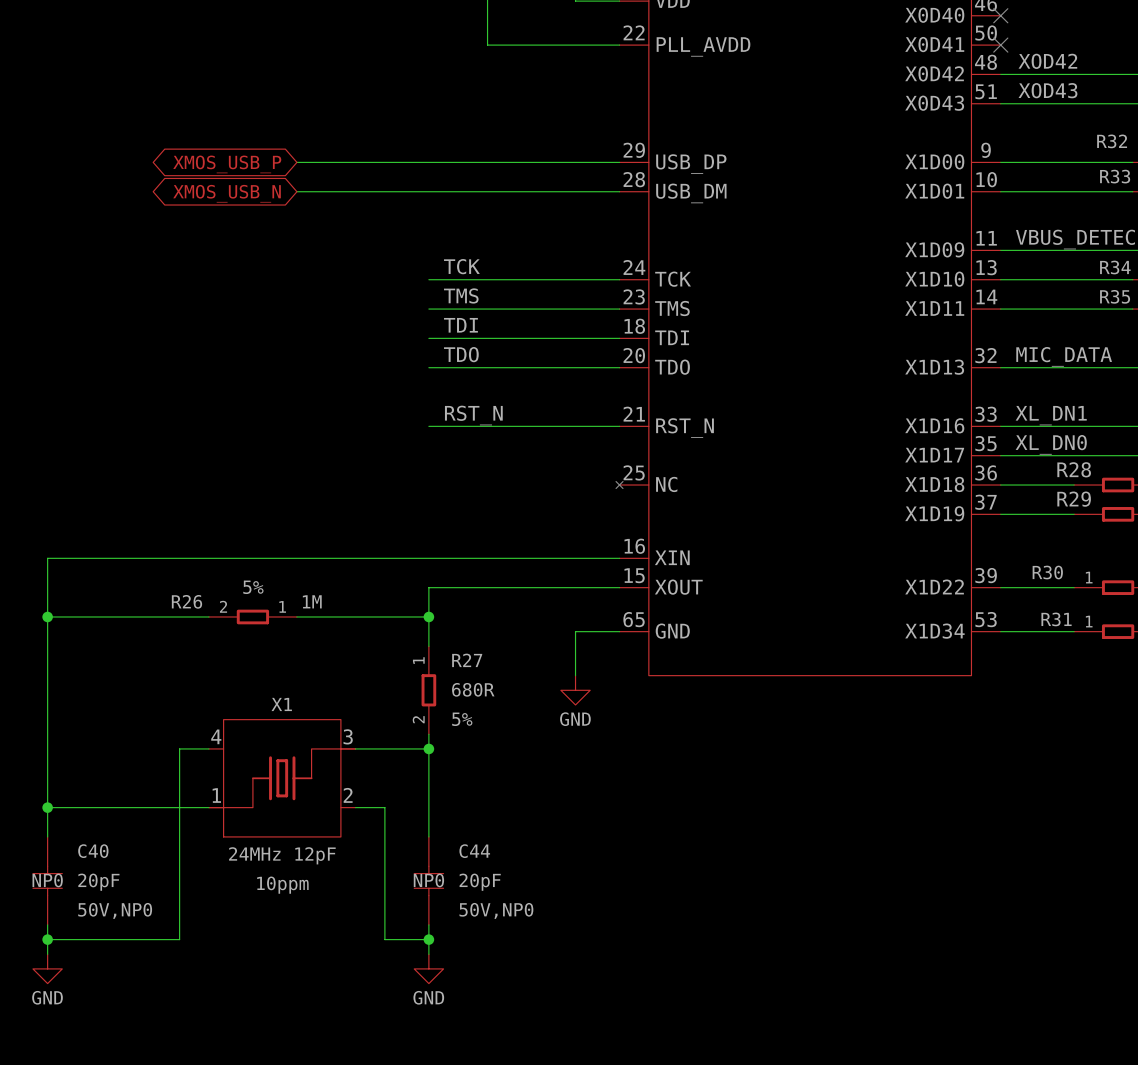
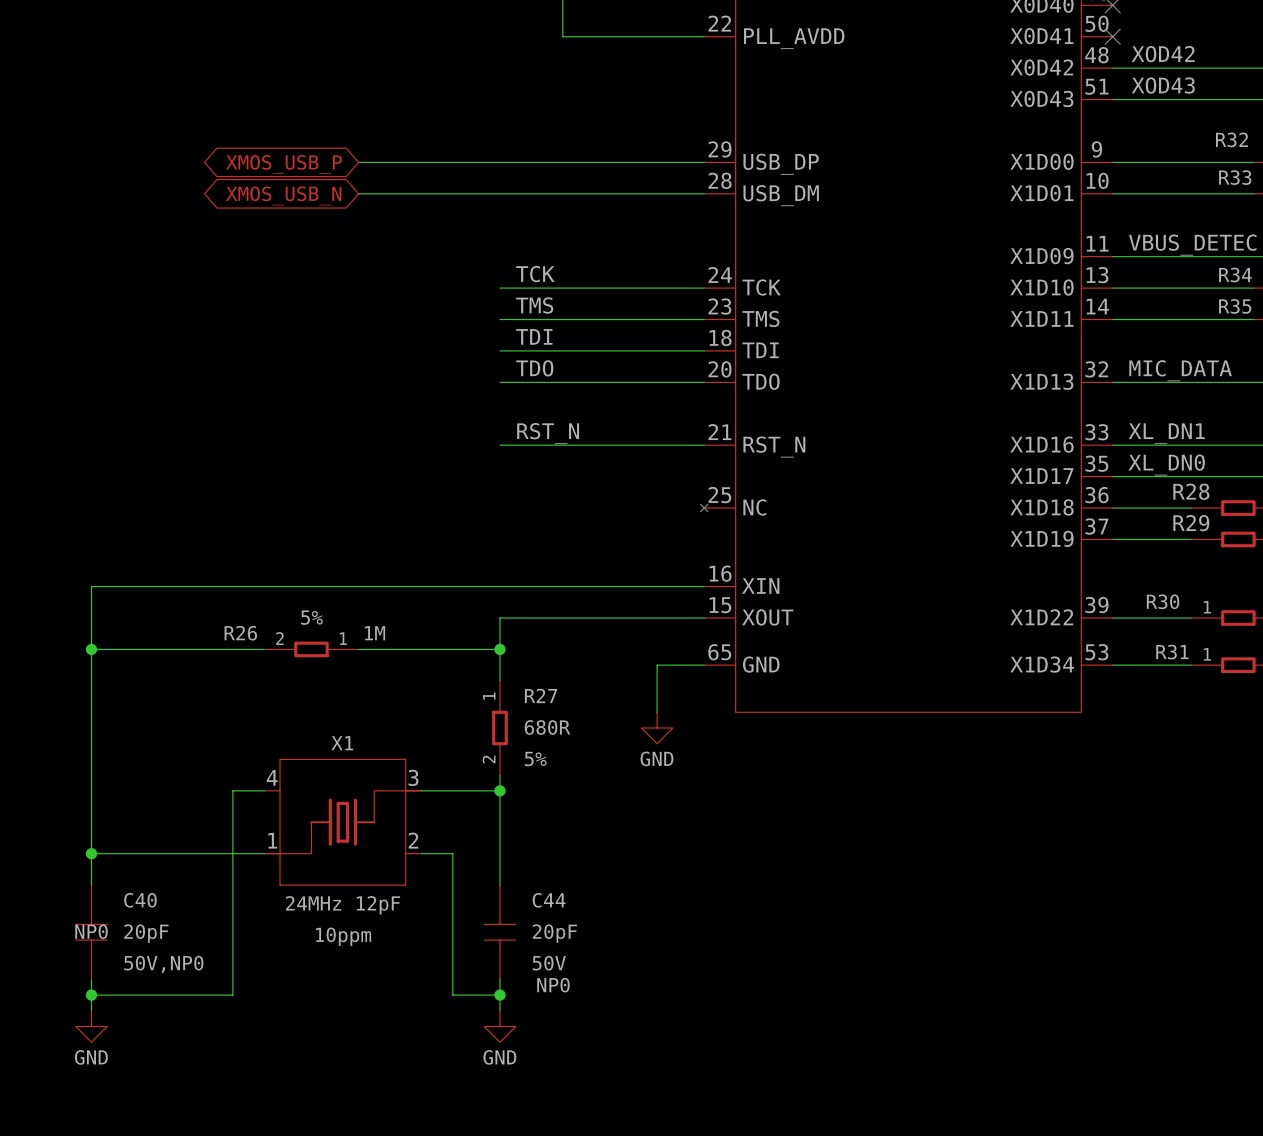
C44 text position: NP0 (428, 880) -> NP0 (553, 985)
C44 text: 50V,NP0 (496, 910) -> 50V (549, 963)

